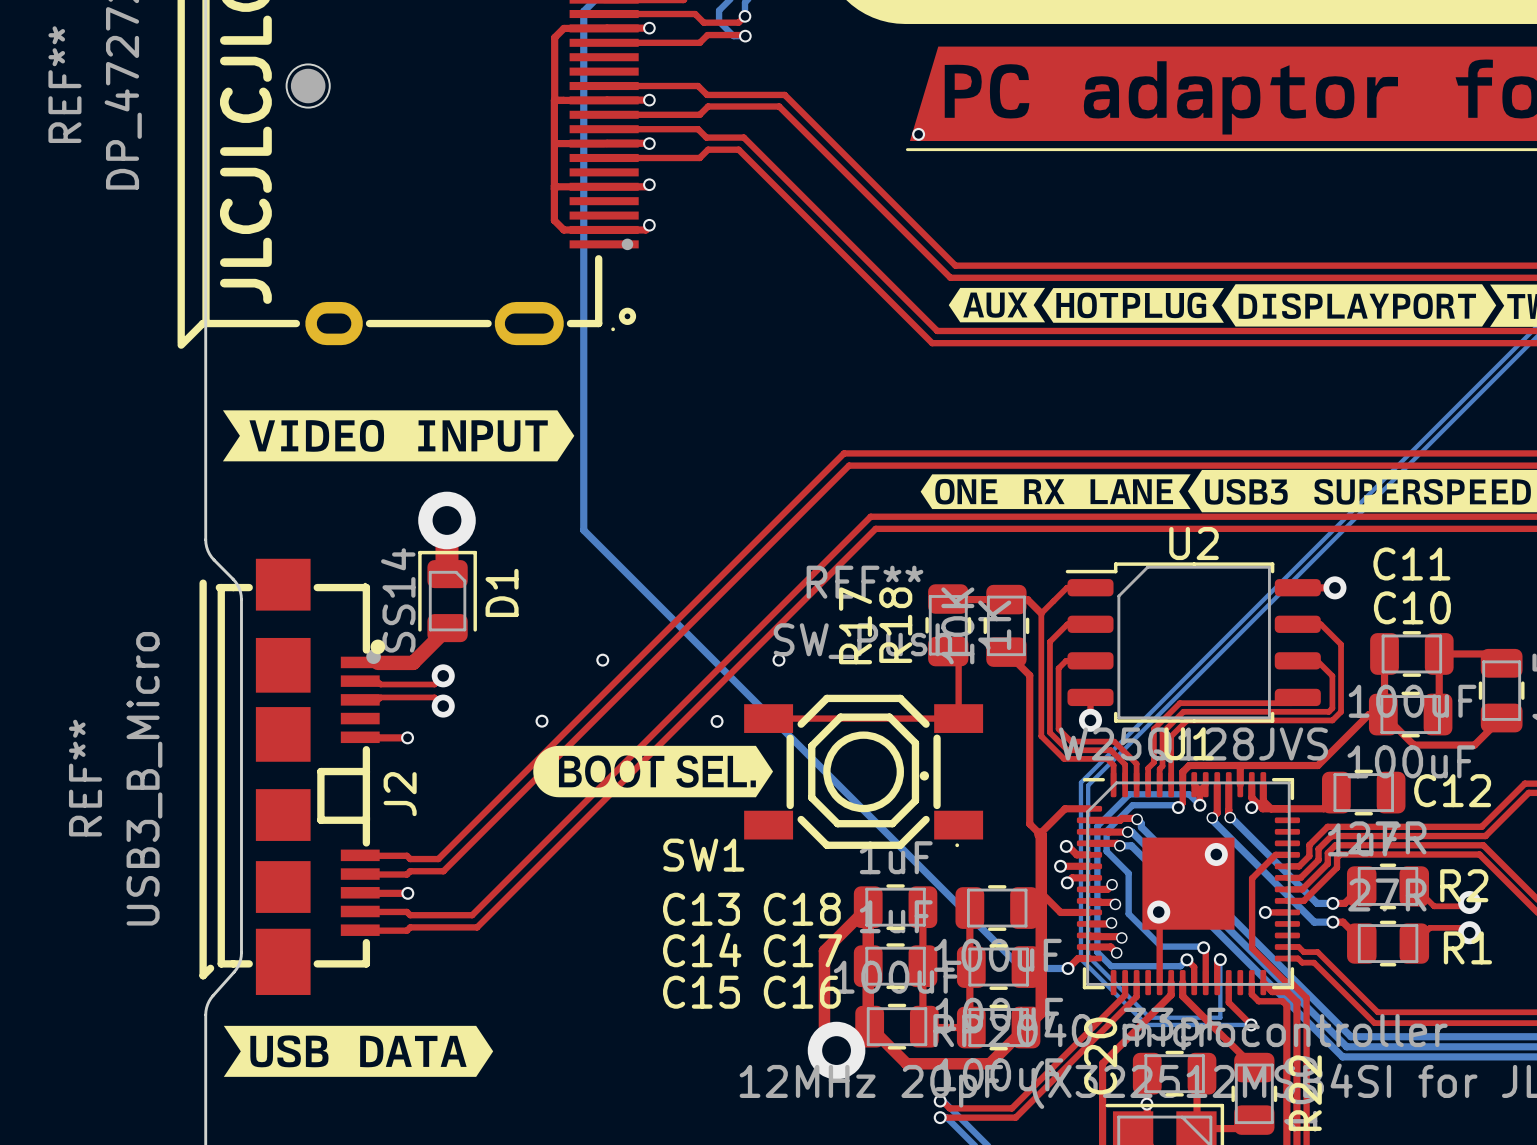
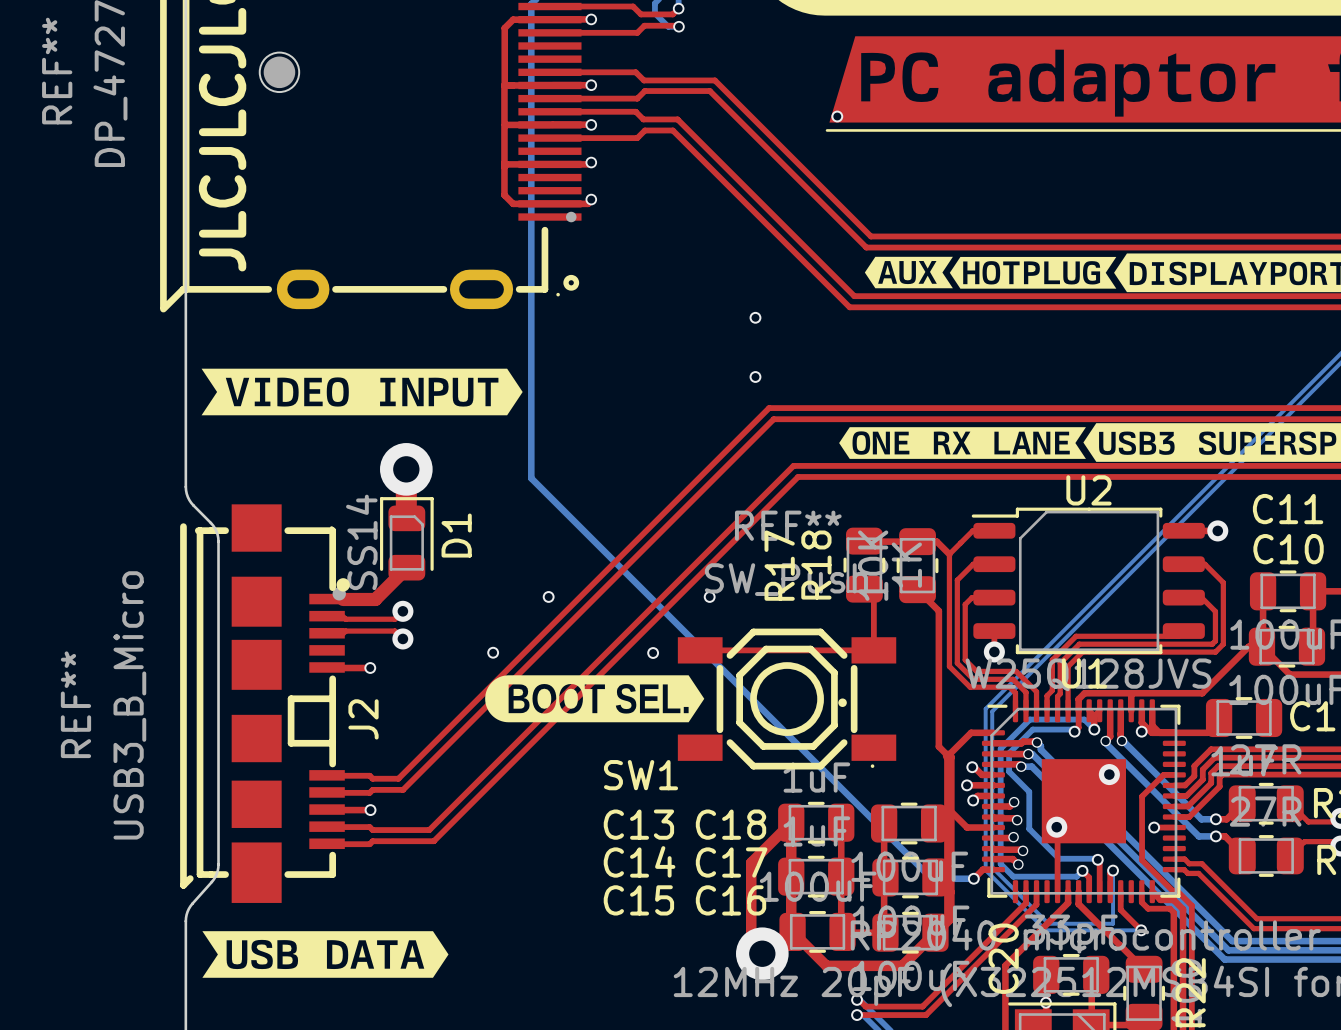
via: none -> (755, 317)
via: none -> (755, 376)

